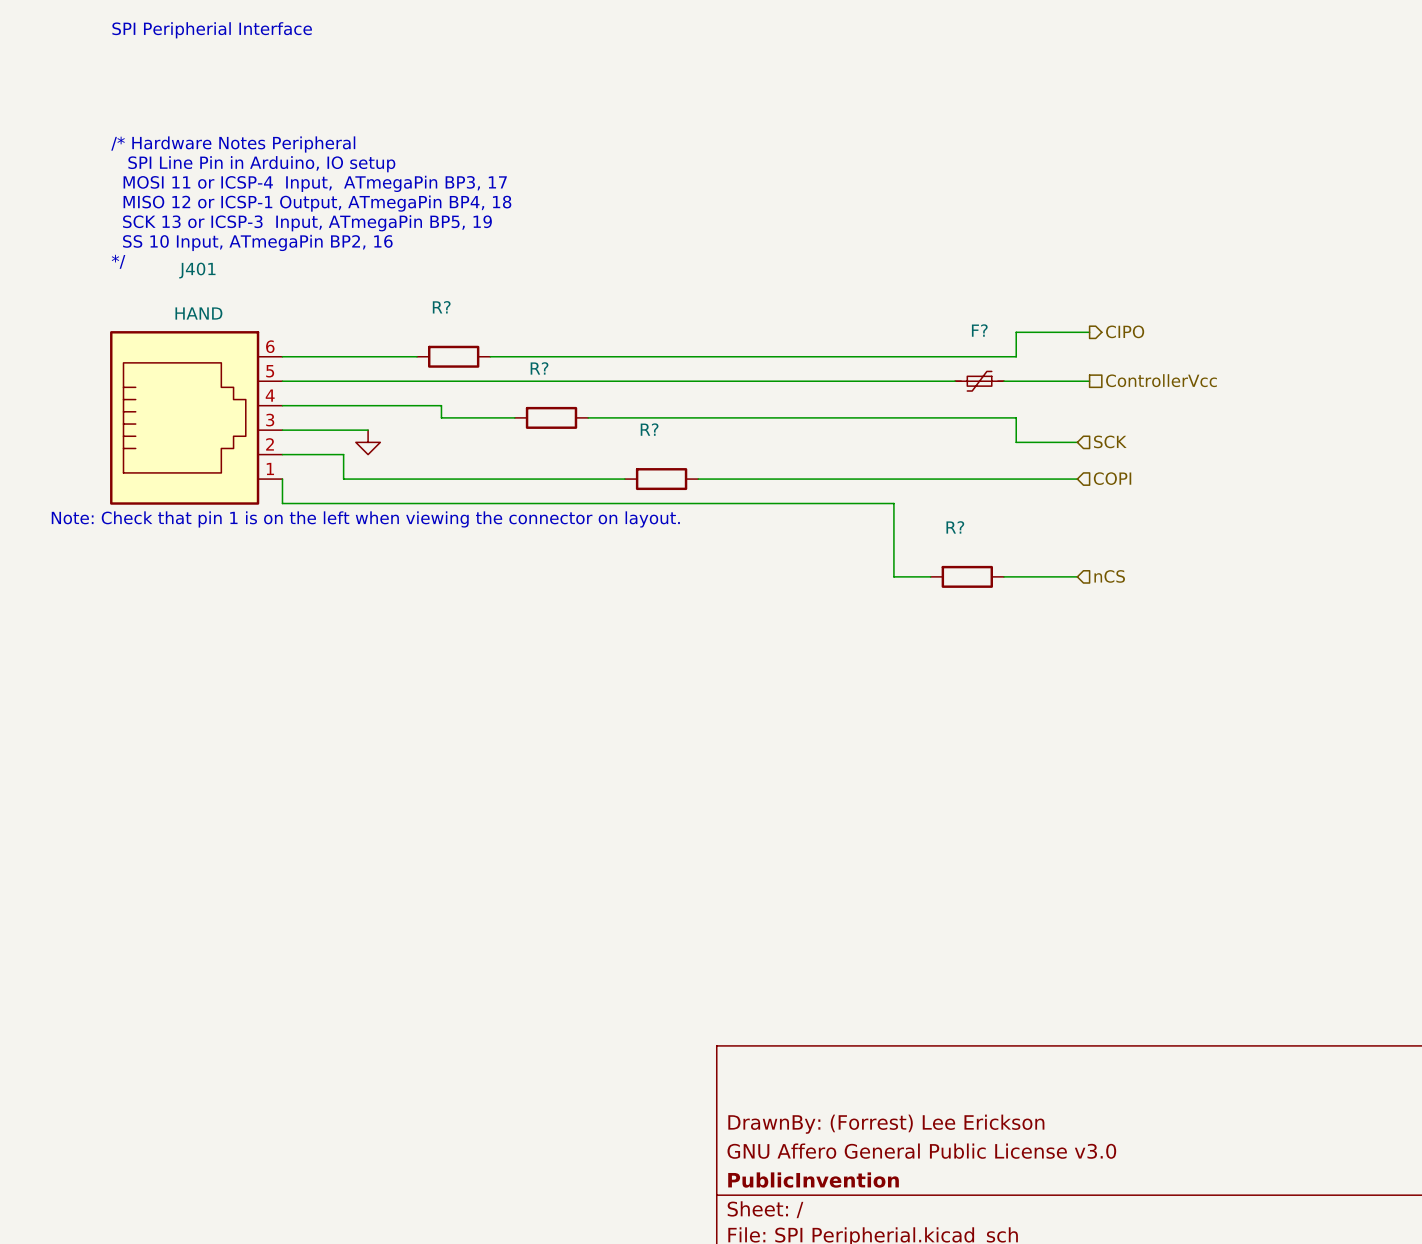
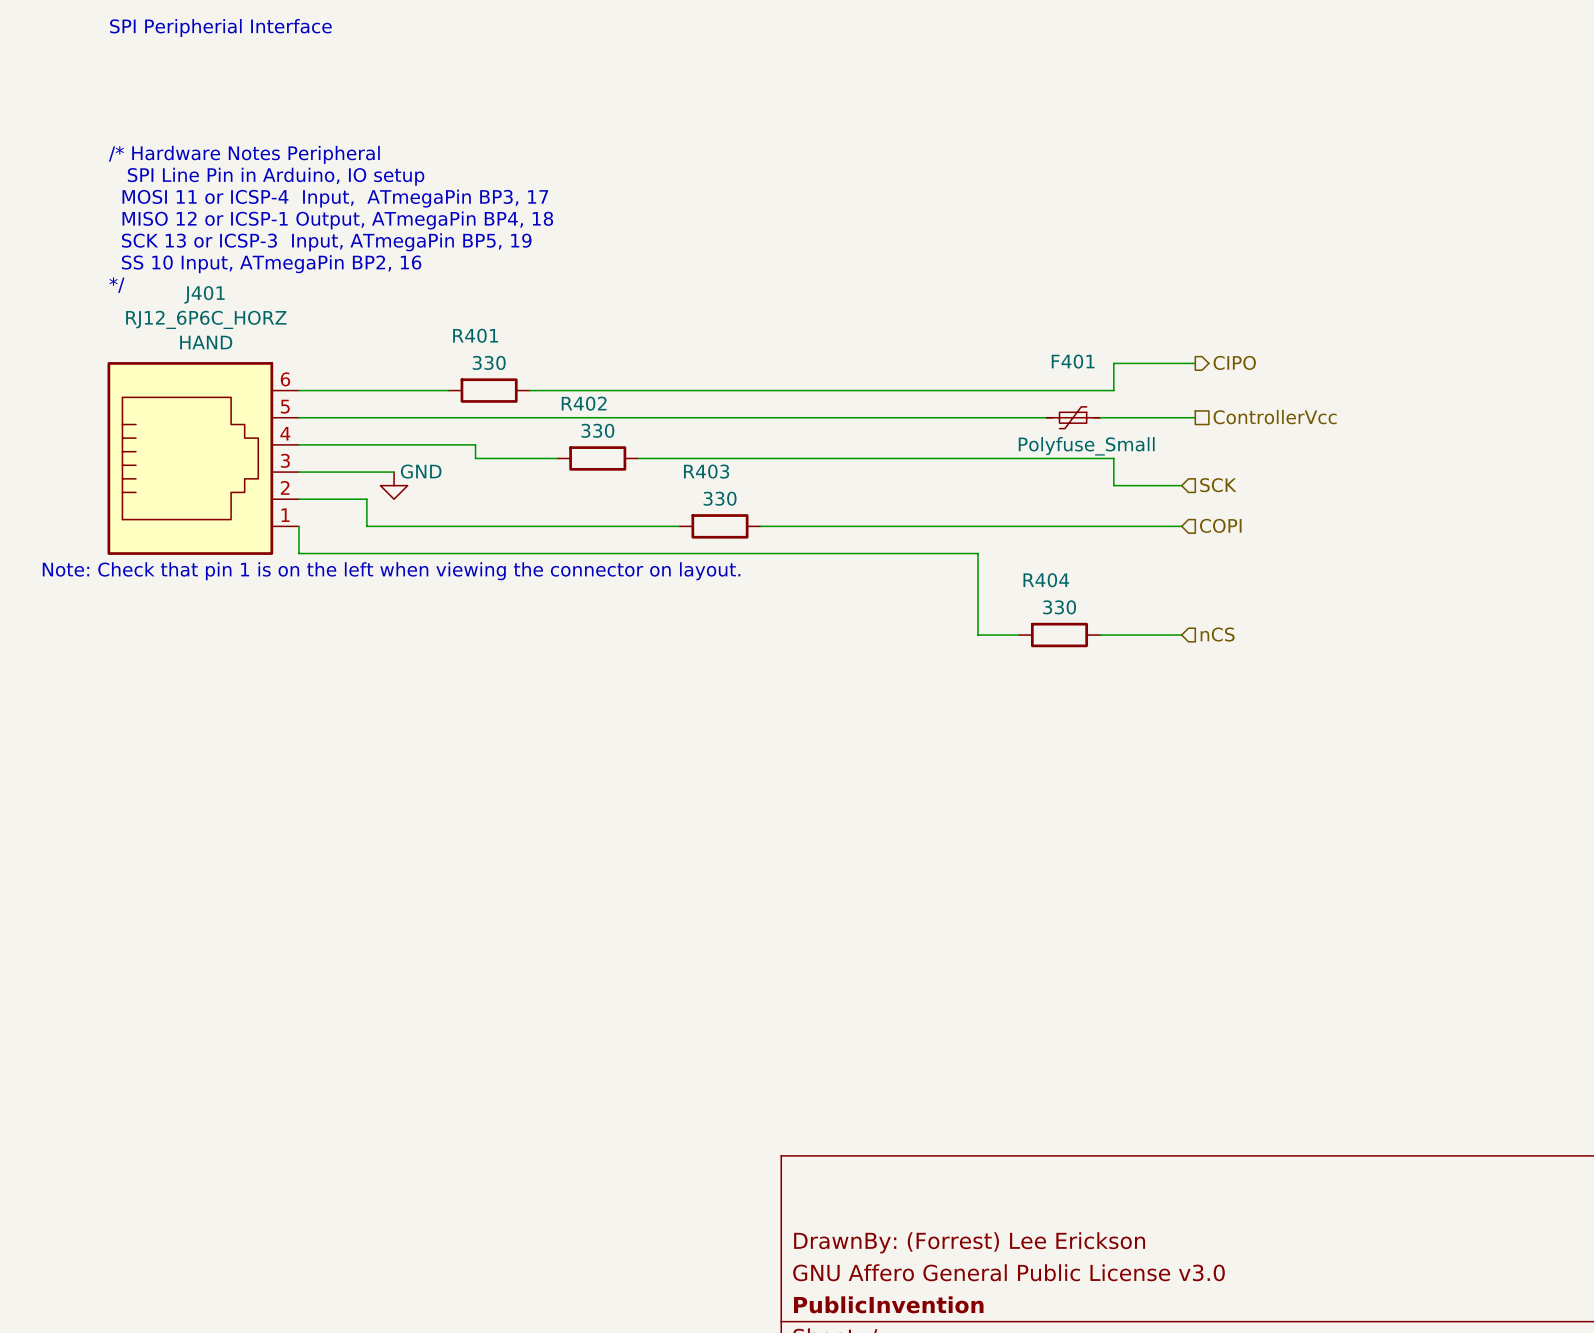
J401 value: none -> RJ12_6P6C_HORZ (206, 319)
R? name: R? (441, 307) -> R401 (475, 335)
F? name: F? (979, 330) -> F401 (1073, 361)
R? value: none -> 330 (489, 362)
R? name: R? (539, 368) -> R402 (584, 403)
R? value: none -> 330 (597, 430)
F? value: none -> Polyfuse_Small (1086, 446)
power symbol text: none -> GND (421, 471)
R? name: R? (649, 429) -> R403 (706, 471)
R? value: none -> 330 (720, 498)
R? name: R? (955, 527) -> R404 (1046, 580)
R? value: none -> 330 (1059, 607)

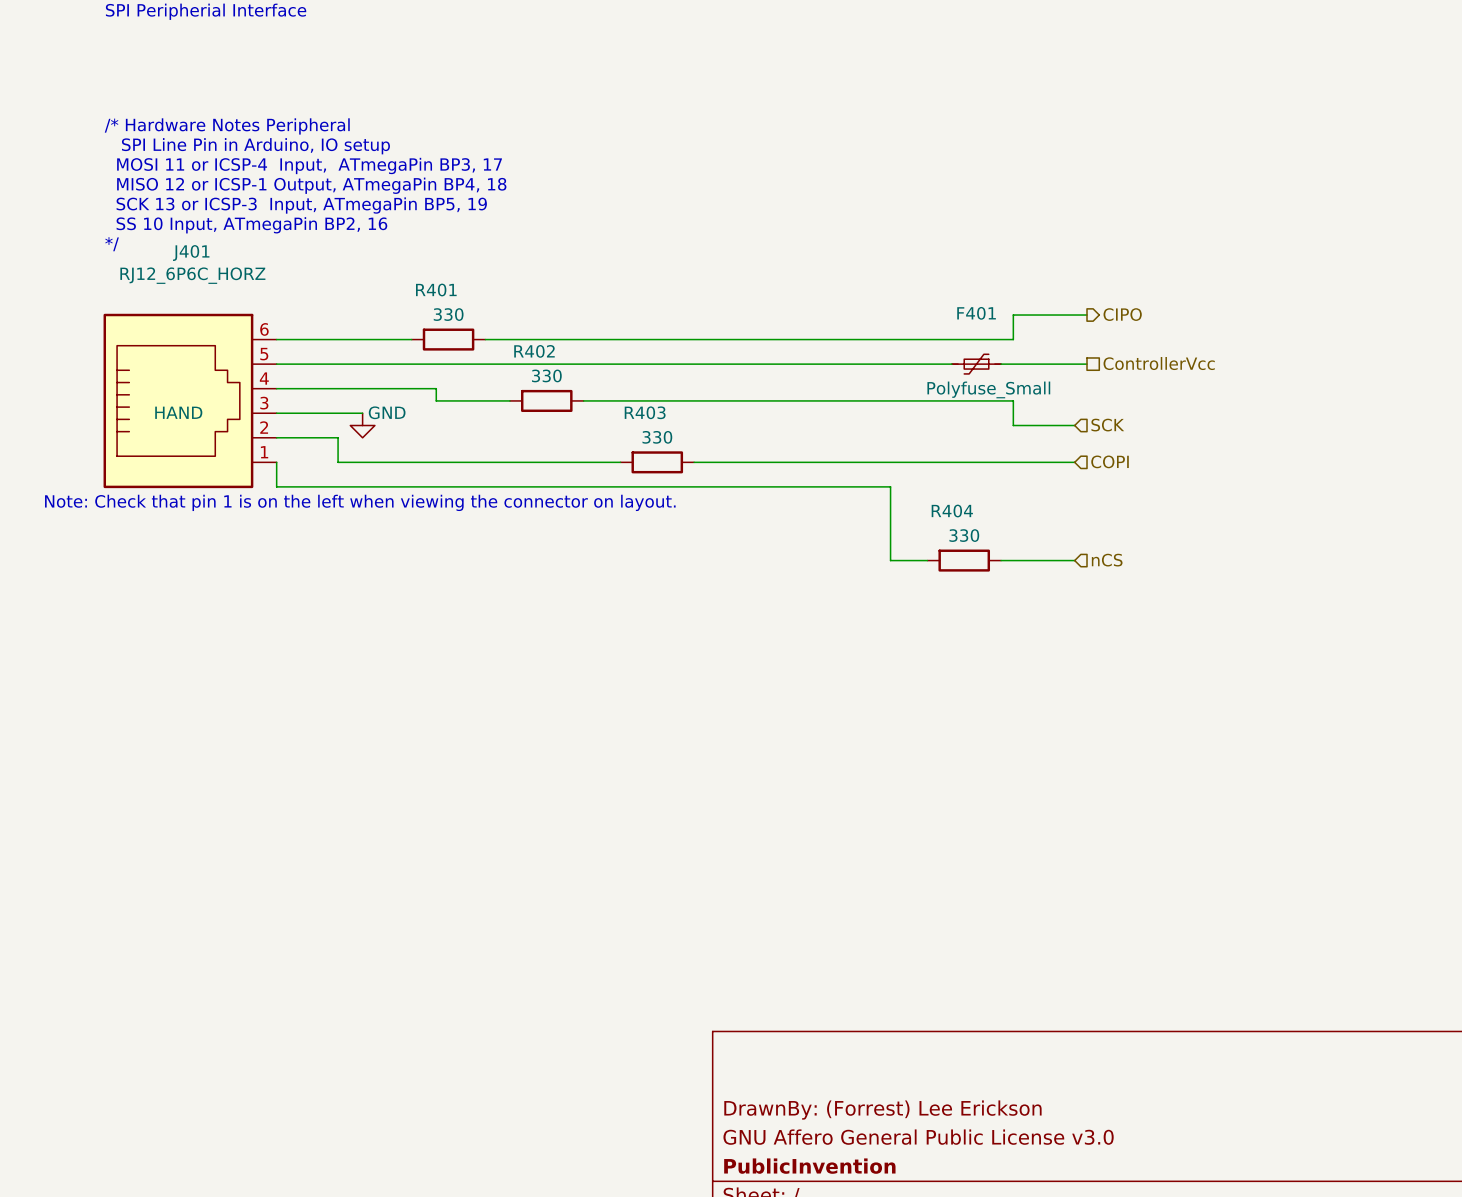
J401 text: HAND (206, 342) -> none
J401 text: none -> HAND (178, 412)

